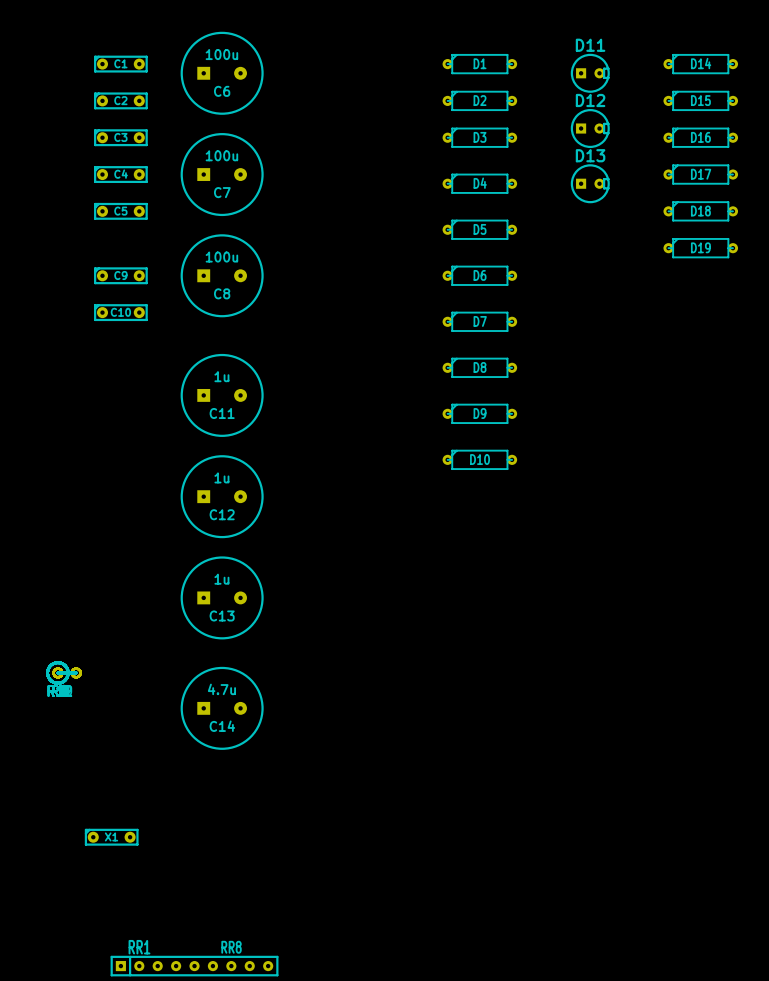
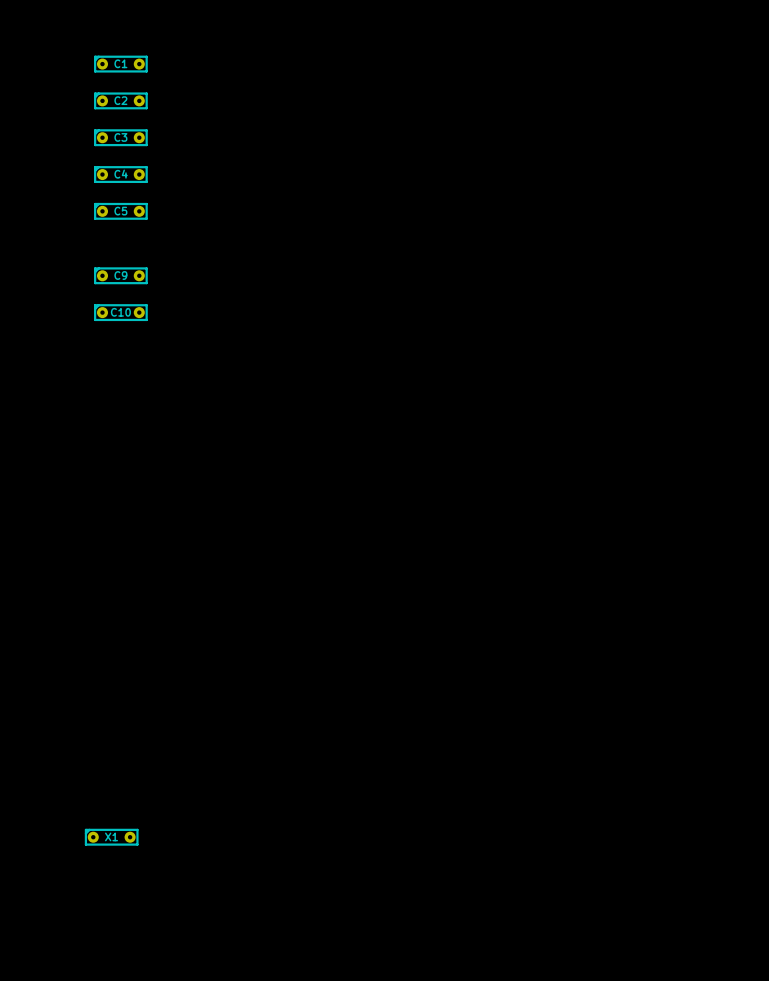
D1: (479, 64) -> none
D14: (700, 64) -> none
C6: 100u (222, 73) -> none
D11: (590, 73) -> none
D2: (479, 100) -> none
D15: (700, 100) -> none
D12: (590, 128) -> none
D3: (479, 137) -> none
D16: (700, 137) -> none
C7: 100u (222, 174) -> none
D17: (700, 174) -> none
D4: (479, 183) -> none
D13: (590, 183) -> none
D18: (700, 211) -> none
D5: (479, 229) -> none
D19: (700, 248) -> none
C8: 100u (222, 275) -> none
D6: (479, 275) -> none
D7: (479, 321) -> none
D8: (479, 367) -> none
C11: 1u (222, 395) -> none
D9: (479, 413) -> none
D10: (479, 459) -> none
C12: 1u (222, 496) -> none
C13: 1u (222, 597) -> none
part: (63, 672) -> none
part: (63, 672) -> none
part: (63, 672) -> none
part: (63, 672) -> none
part: (63, 672) -> none
part: (63, 672) -> none
part: (63, 672) -> none
part: (63, 672) -> none
part: (63, 672) -> none
part: (63, 672) -> none
part: (63, 672) -> none
part: (63, 672) -> none
C14: 4.7u (222, 708) -> none
RR1: RR8 (194, 966) -> none

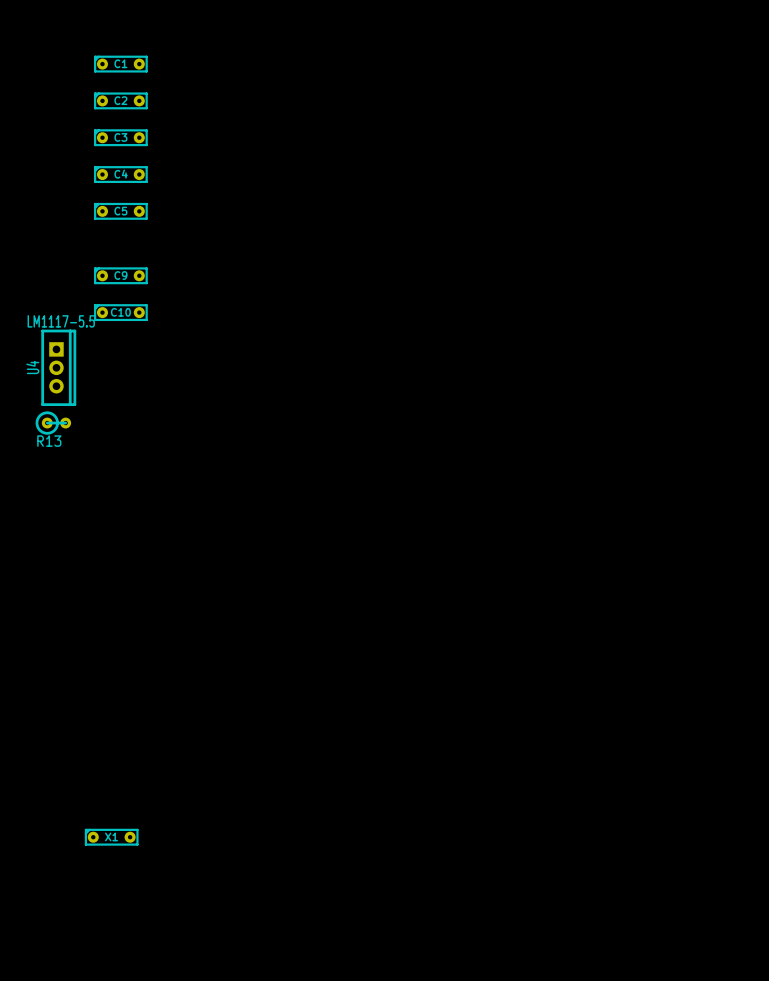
U4: none -> LM1117-5.5 (58, 367)
R13: none -> (53, 423)

